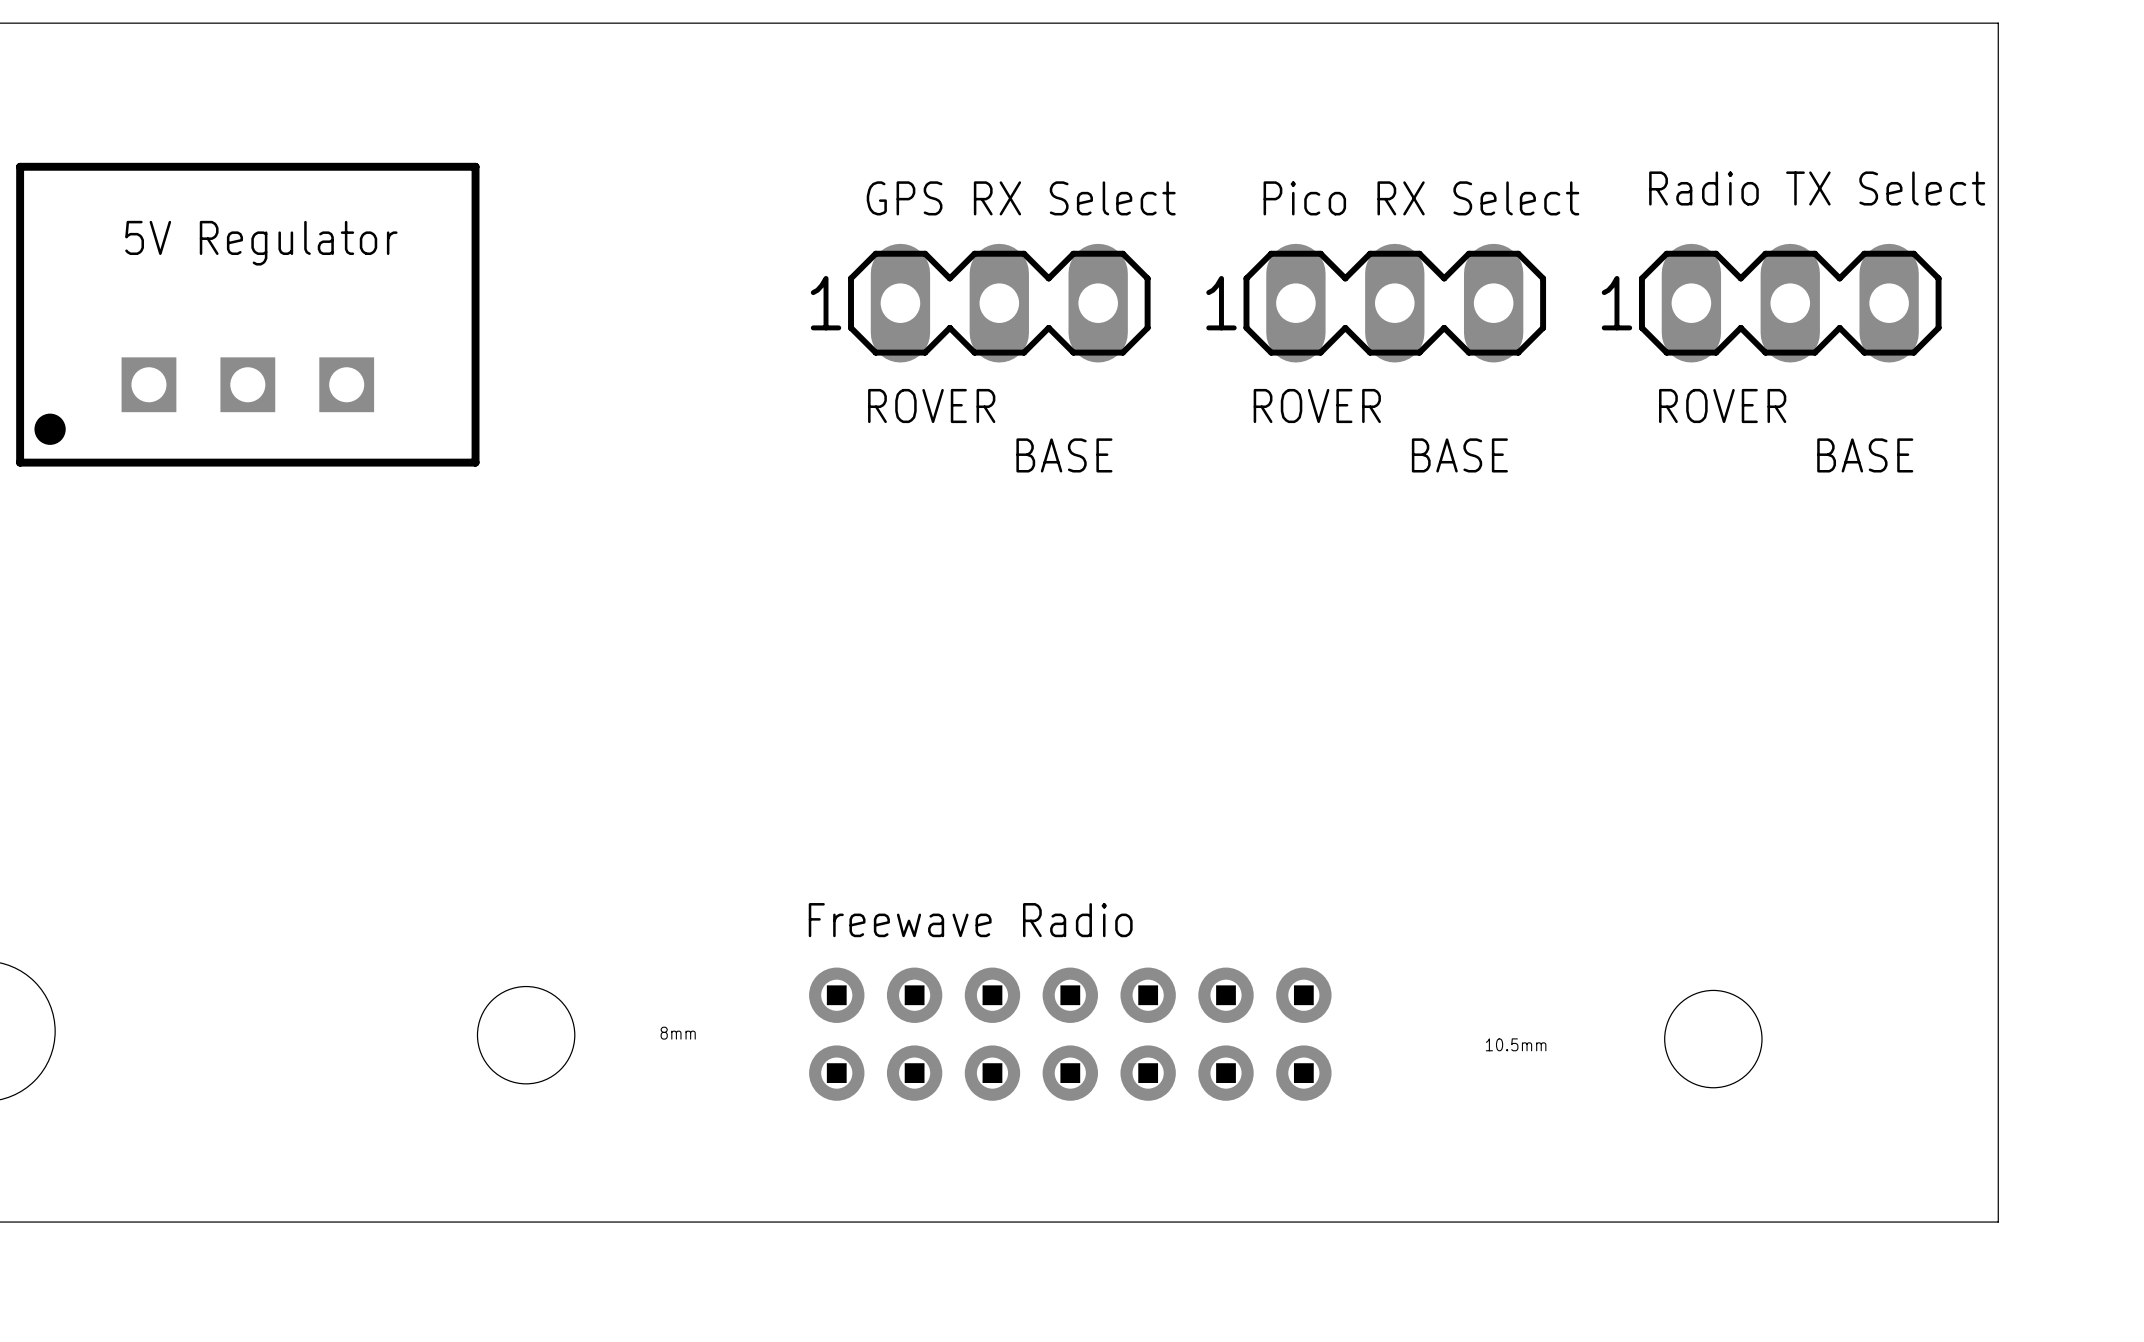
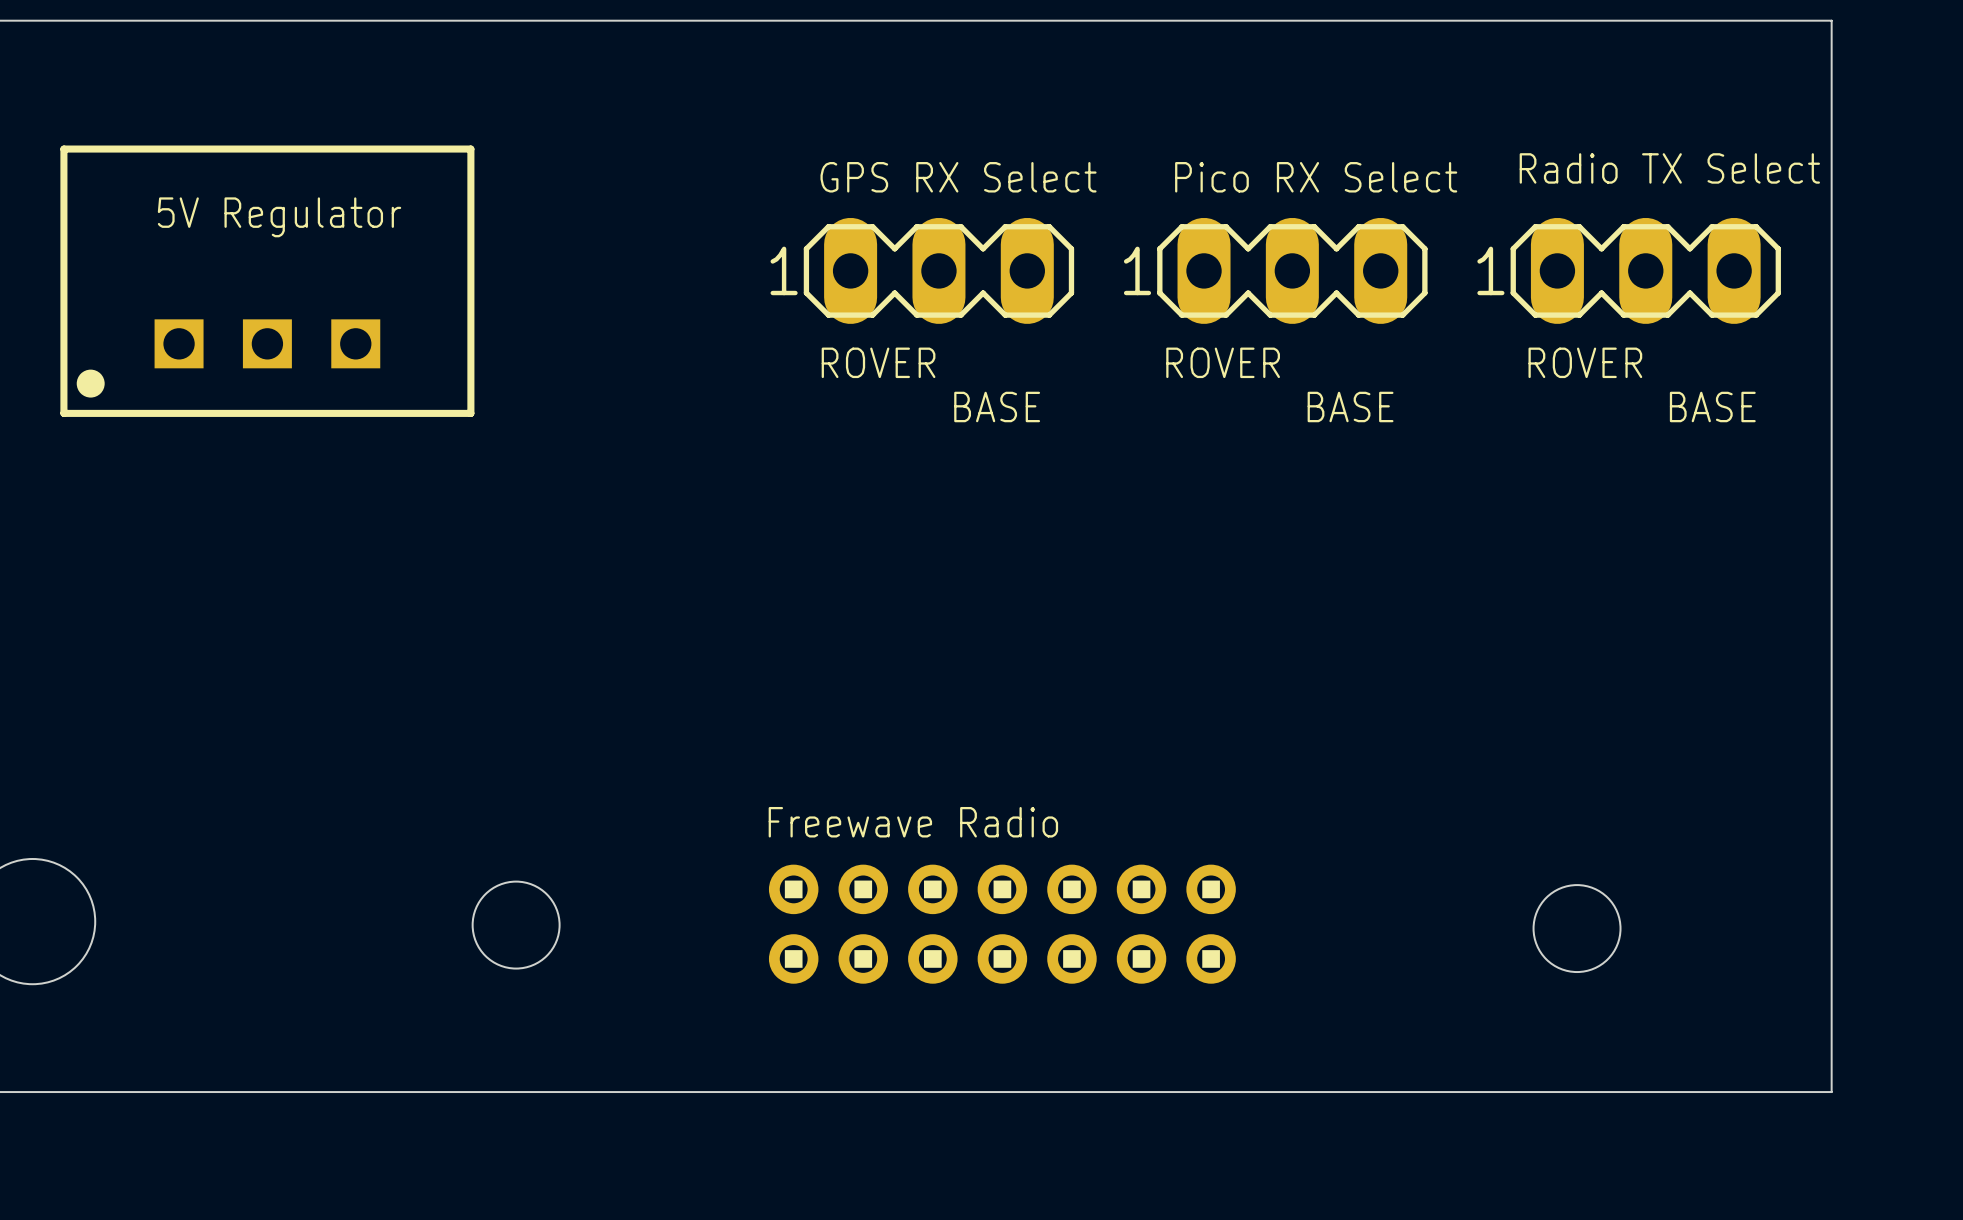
text: 8mm (678, 1033) -> none
text: 10.5mm (1516, 1044) -> none

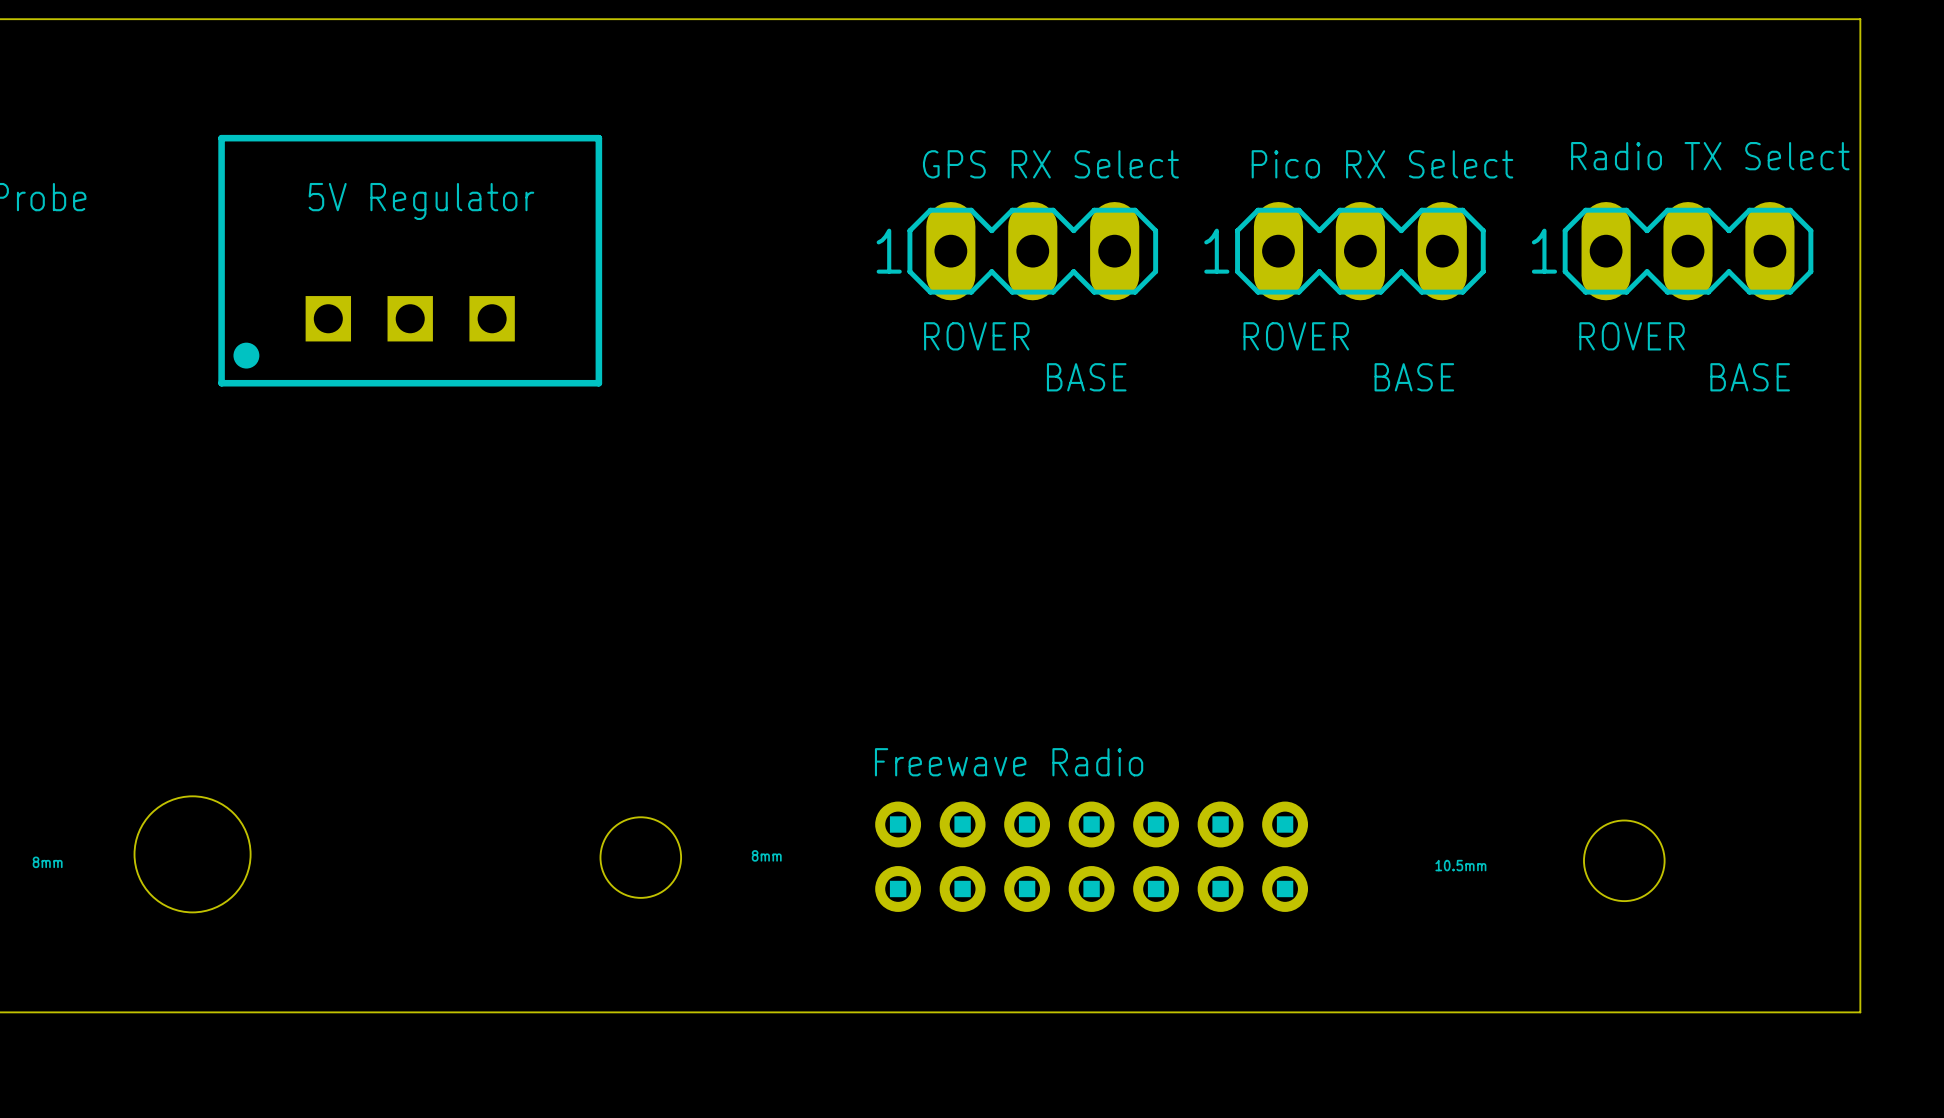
text: none -> 8mm (766, 855)
text: none -> 10.5mm (1460, 865)

